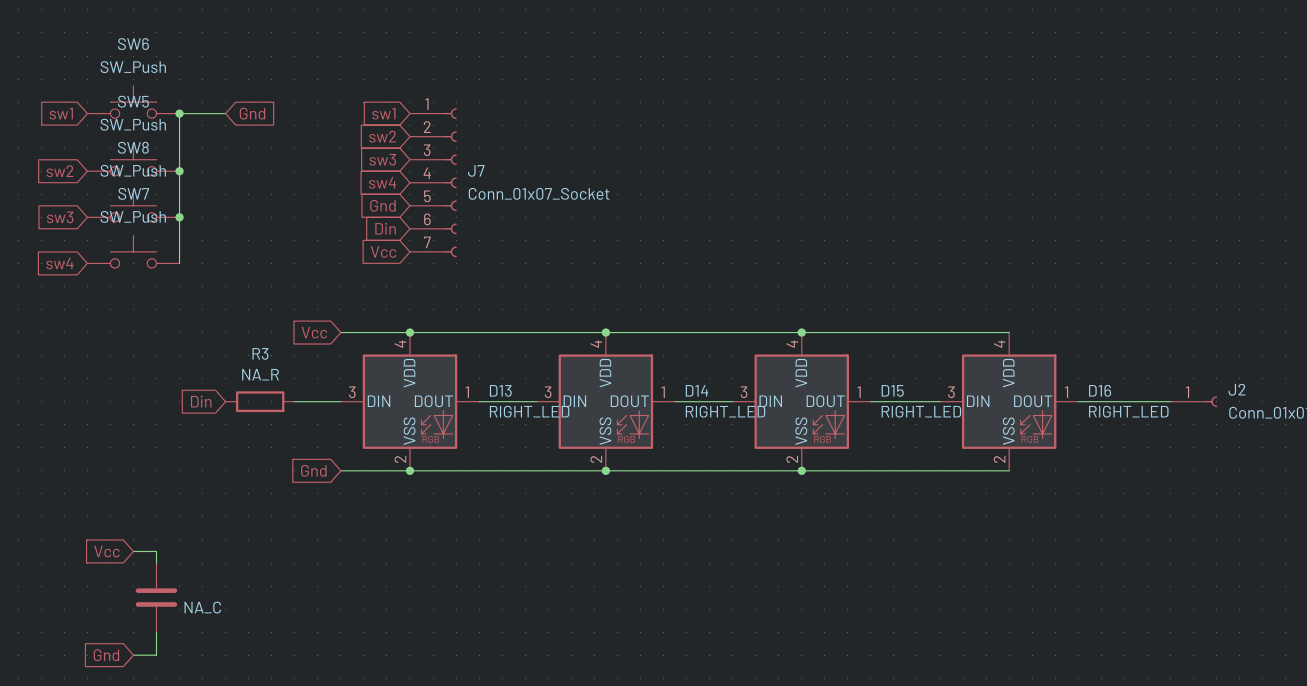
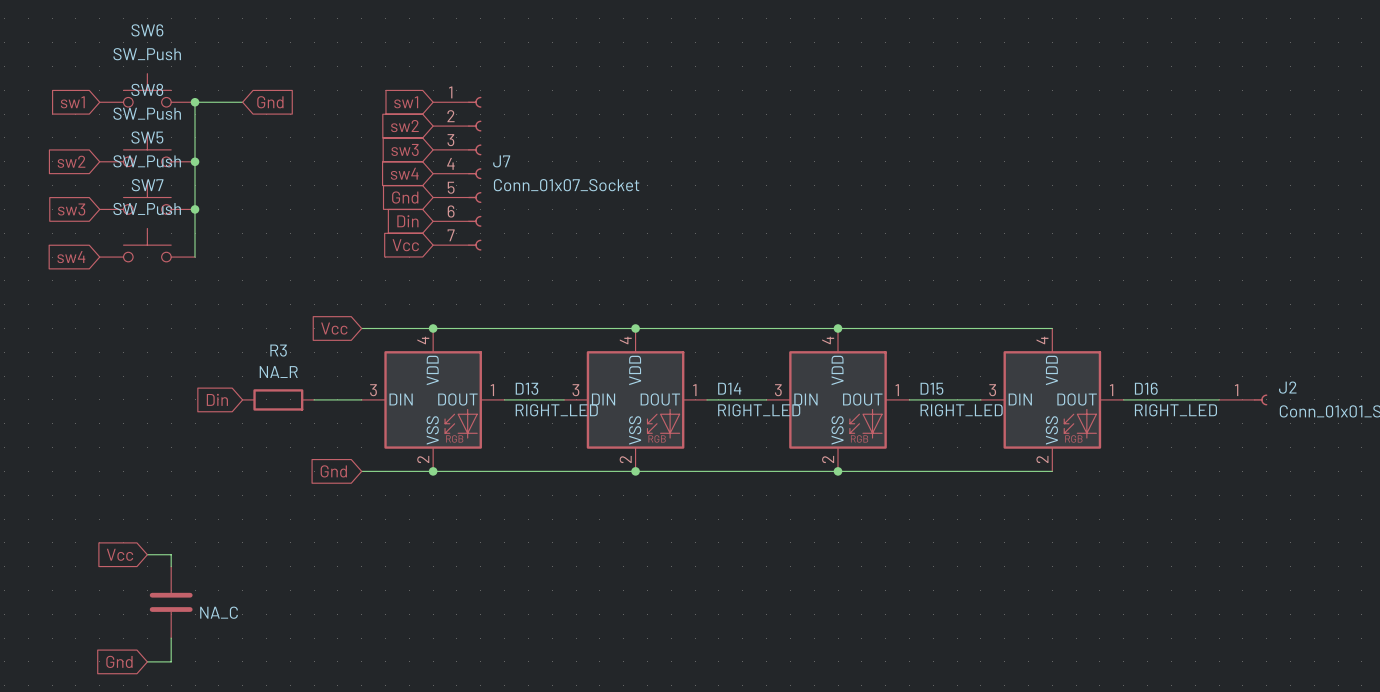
SW5 name: SW5 (133, 101) -> SW8 (147, 89)
SW8 name: SW8 (133, 147) -> SW5 (147, 137)

